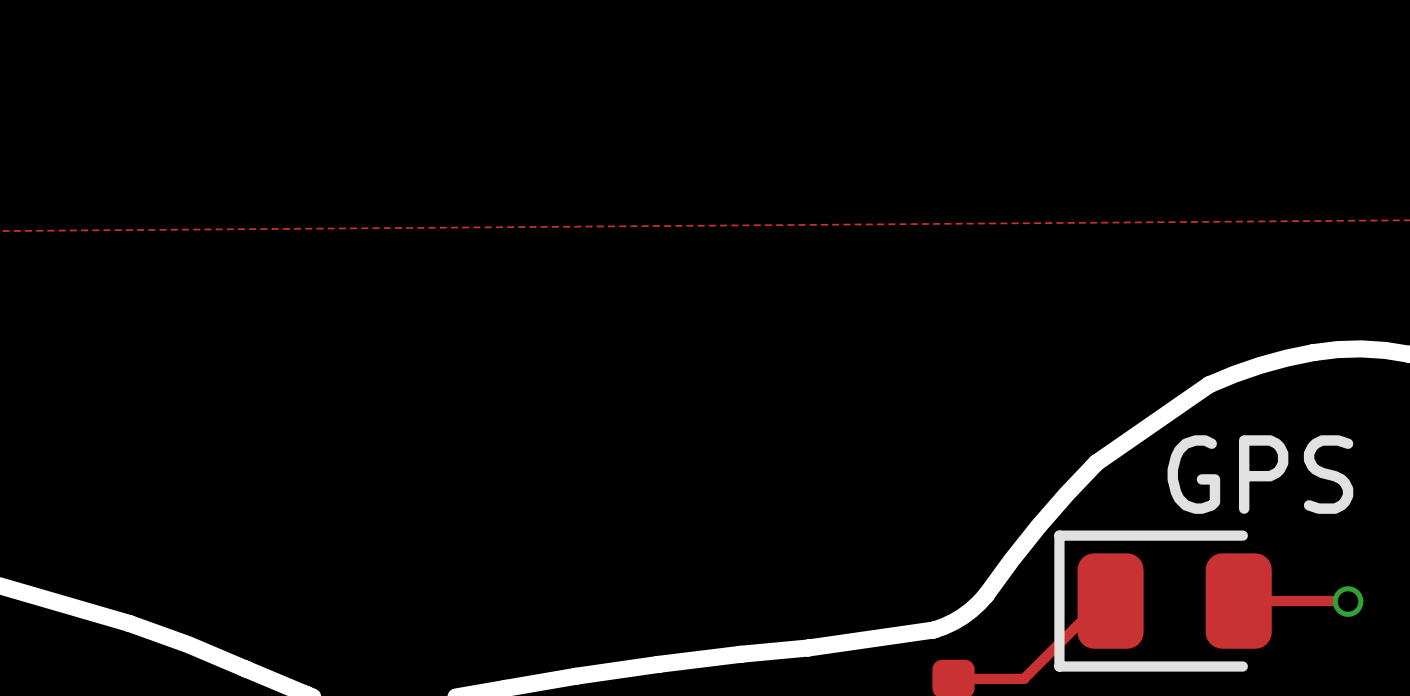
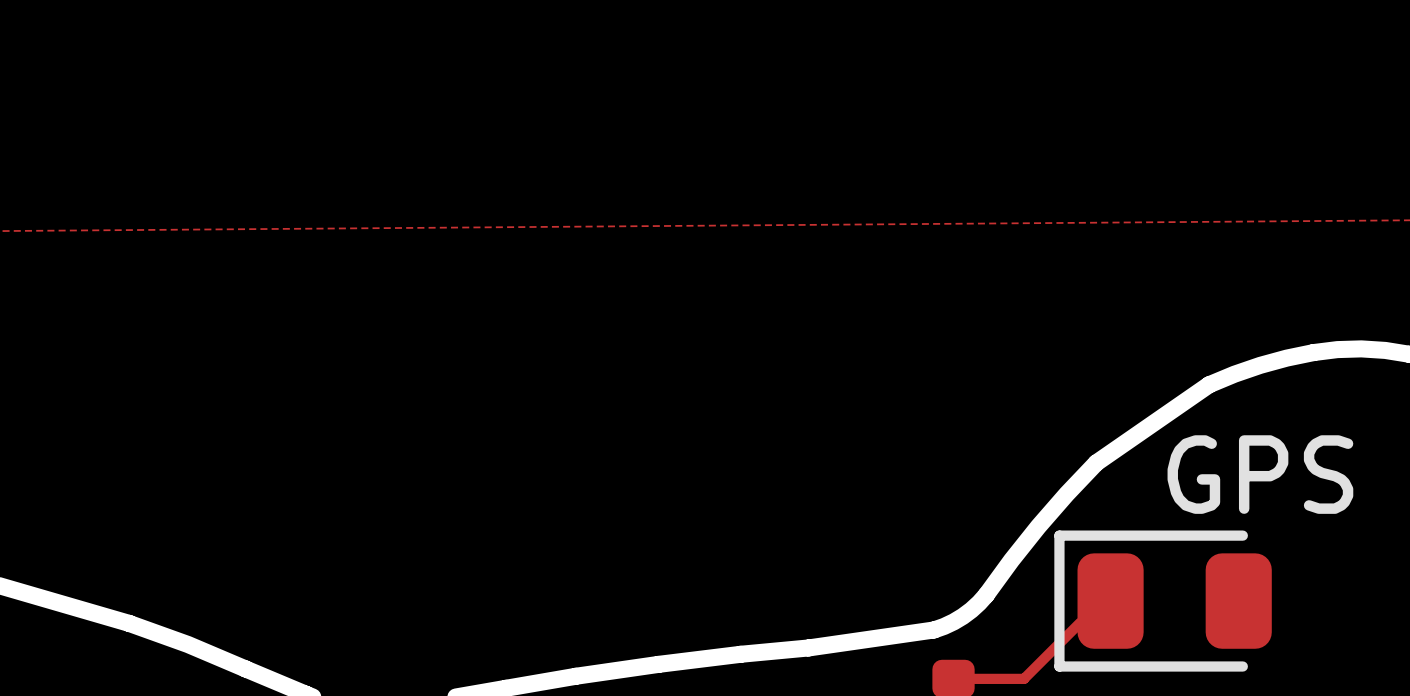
top track: (1238, 601) (1347, 601) -> none
via: (1348, 601) -> none

